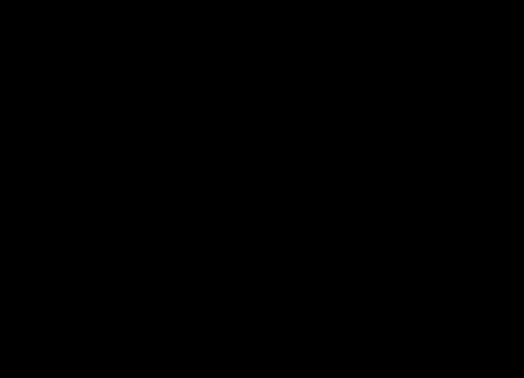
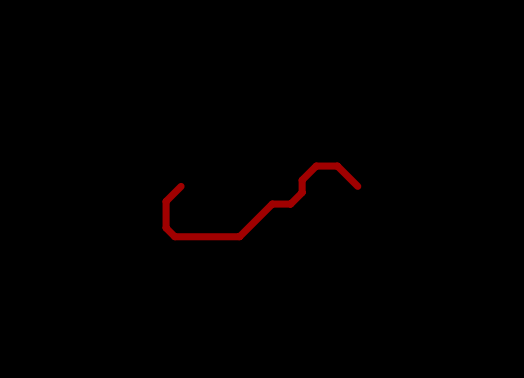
track: none -> (181, 186) (166, 201) (166, 227) (174, 236) (239, 236) (272, 204) (290, 204) (302, 192) (302, 180) (316, 166) (337, 166) (357, 186)

